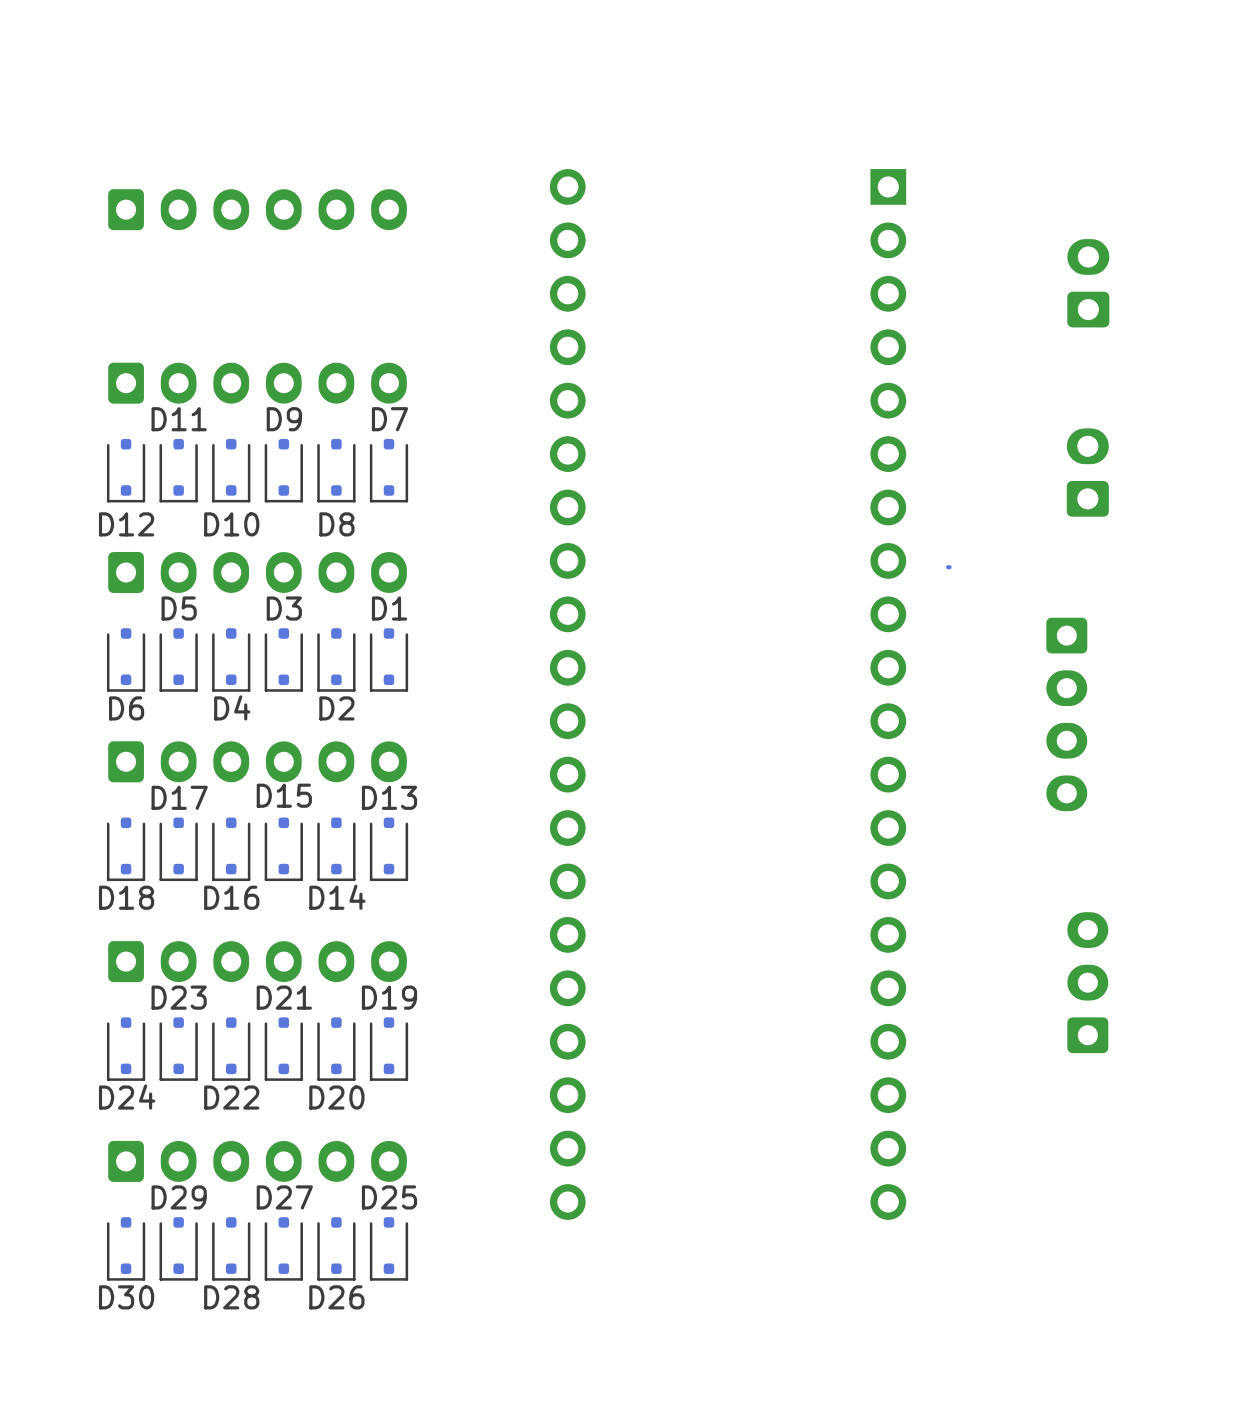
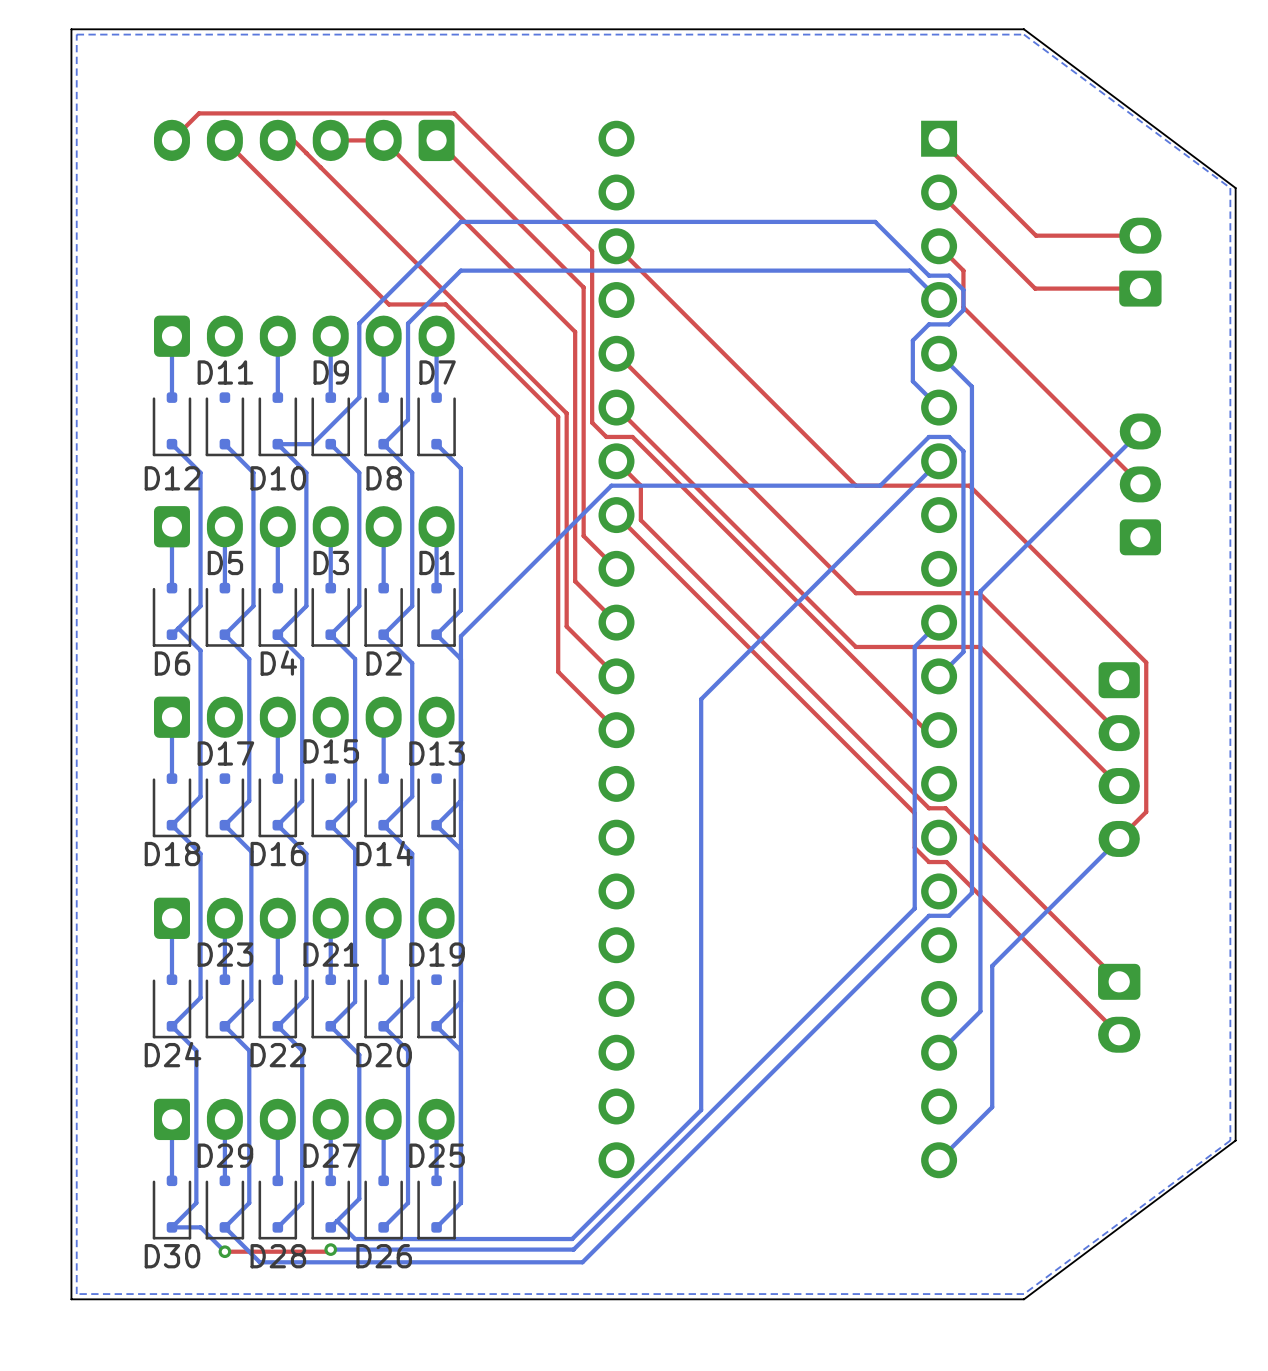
board edge: none -> (1023, 29) (71, 29) (71, 1299) (1023, 1299) (1235, 1140) (1235, 188) (1023, 29)
bottom zone outline: none -> (1023, 34) (1230, 188) (1230, 1140) (1023, 1294) (76, 1294) (76, 34) (1023, 34)
top track: none -> (939, 138) (1036, 235) (1140, 235)
top track: none -> (171, 140) (198, 113) (454, 113) (592, 251) (592, 422) (606, 436) (632, 436) (925, 730) (939, 730)
top track: none -> (224, 140) (388, 304) (445, 304) (558, 416) (558, 671) (616, 730)
top track: none -> (277, 140) (293, 140) (320, 167)
top track: none -> (330, 140) (383, 140) (575, 331) (575, 581) (616, 622)
top track: none -> (436, 140) (583, 287) (583, 536) (616, 568)
part rotation: 0° (257, 209) -> 180° (304, 140)
top track: none -> (320, 167) (566, 413) (566, 626) (616, 676)
top track: none -> (939, 192) (1035, 288) (1140, 288)
part position: (1088, 283) -> (1140, 262)
top track: none -> (616, 246) (855, 485) (969, 485) (1146, 662) (1146, 811) (1119, 838)
top track: none -> (939, 246) (963, 270) (963, 307) (1140, 484)
bottom track: none -> (939, 300) (909, 270) (460, 270) (408, 323) (408, 419) (383, 444) (412, 472) (412, 606) (383, 634) (412, 663) (412, 796) (383, 825) (412, 853) (412, 997) (383, 1026) (408, 1050) (408, 1203) (383, 1227)
bottom track: none -> (171, 336) (171, 397)
bottom track: none -> (277, 336) (277, 397)
bottom track: none -> (330, 336) (330, 397)
bottom track: none -> (383, 336) (383, 397)
bottom track: none -> (436, 336) (436, 397)
top track: none -> (616, 353) (855, 593) (979, 593) (1119, 733)
bottom track: none -> (939, 353) (971, 386) (971, 893) (949, 915) (929, 915) (582, 1262) (259, 1262) (224, 1227) (249, 1203) (249, 1050) (224, 1026) (251, 999) (251, 851) (224, 825) (249, 800) (249, 659) (224, 634) (253, 606) (253, 472) (224, 444)
top track: none -> (616, 407) (855, 646) (980, 646) (1119, 786)
bottom track: none -> (939, 407) (912, 381) (912, 340) (929, 324) (949, 324) (963, 310) (963, 289) (949, 275) (929, 275) (875, 221) (460, 221) (359, 323) (359, 397) (312, 444) (277, 444) (306, 472) (306, 606) (277, 634) (302, 659) (302, 800) (277, 825) (306, 853) (306, 997) (277, 1026) (302, 1050) (302, 1203) (277, 1227)
part: (1087, 472) -> none
bottom track: none -> (1140, 431) (980, 591) (980, 1011) (939, 1052)
bottom track: none -> (171, 444) (200, 472) (200, 606) (171, 634)
bottom track: none -> (330, 444) (359, 472) (359, 606) (330, 634) (355, 659) (355, 800) (330, 825) (355, 849) (355, 1001) (330, 1026) (359, 1054) (359, 1198) (330, 1227)
bottom track: none -> (436, 444) (460, 468) (460, 610) (436, 634) (460, 659)
top track: none -> (616, 461) (640, 485) (640, 520) (929, 808) (945, 808) (1119, 981)
bottom track: none -> (939, 461) (701, 699) (701, 1110) (572, 1239) (355, 1239) (337, 1221)
top track: none -> (616, 515) (914, 813) (914, 847) (929, 862) (946, 862) (1119, 1034)
bottom track: (949, 567) (948, 567) -> none
bottom track: none -> (171, 526) (171, 588)
bottom track: none -> (224, 526) (224, 588)
bottom track: none -> (277, 526) (277, 588)
bottom track: none -> (330, 526) (330, 588)
bottom track: none -> (383, 526) (383, 588)
bottom track: none -> (436, 526) (436, 588)
bottom track: none -> (939, 622) (914, 646) (914, 908) (573, 1249) (330, 1249)
bottom track: none -> (178, 628) (200, 650) (200, 796) (171, 825) (200, 853) (200, 997) (171, 1026) (196, 1050) (196, 1203) (171, 1227) (200, 1227) (224, 1251)
part position: (1066, 714) -> (1119, 759)
bottom track: none -> (939, 676) (963, 652) (963, 451) (949, 436) (929, 436) (880, 485) (611, 485) (460, 636) (460, 1203) (436, 1227)
bottom track: none -> (171, 717) (171, 778)
bottom track: none -> (277, 717) (277, 778)
bottom track: none -> (383, 717) (383, 778)
bottom track: none -> (460, 800) (436, 825) (460, 849)
bottom track: none -> (1119, 838) (992, 965) (992, 1107) (939, 1160)
bottom track: none -> (171, 918) (171, 979)
bottom track: none -> (224, 918) (224, 979)
bottom track: none -> (277, 918) (277, 979)
bottom track: none -> (330, 918) (330, 979)
bottom track: none -> (383, 918) (383, 979)
part position: (1087, 982) -> (1140, 484)
bottom track: none -> (460, 1001) (436, 1026) (460, 1050)
part: none -> (1119, 1008)
bottom track: none -> (171, 1119) (171, 1180)
bottom track: none -> (224, 1119) (224, 1180)
bottom track: none -> (277, 1119) (277, 1180)
bottom track: none -> (330, 1119) (330, 1180)
bottom track: none -> (383, 1119) (383, 1180)
bottom track: none -> (436, 1119) (436, 1180)
top track: none -> (330, 1249) (328, 1251) (224, 1251)
via: none -> (330, 1249)
via: none -> (224, 1251)

